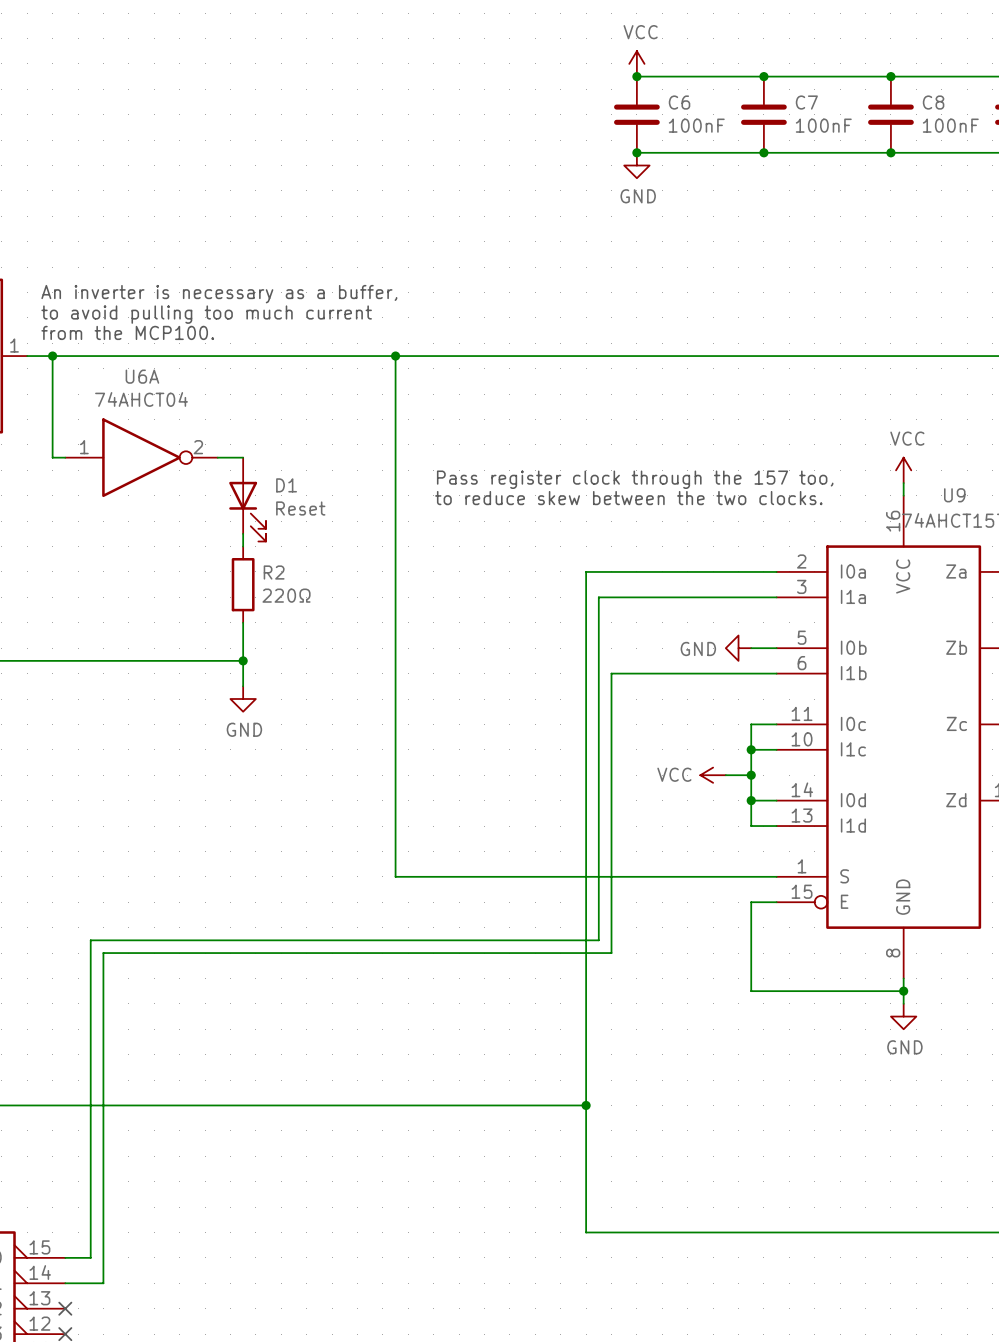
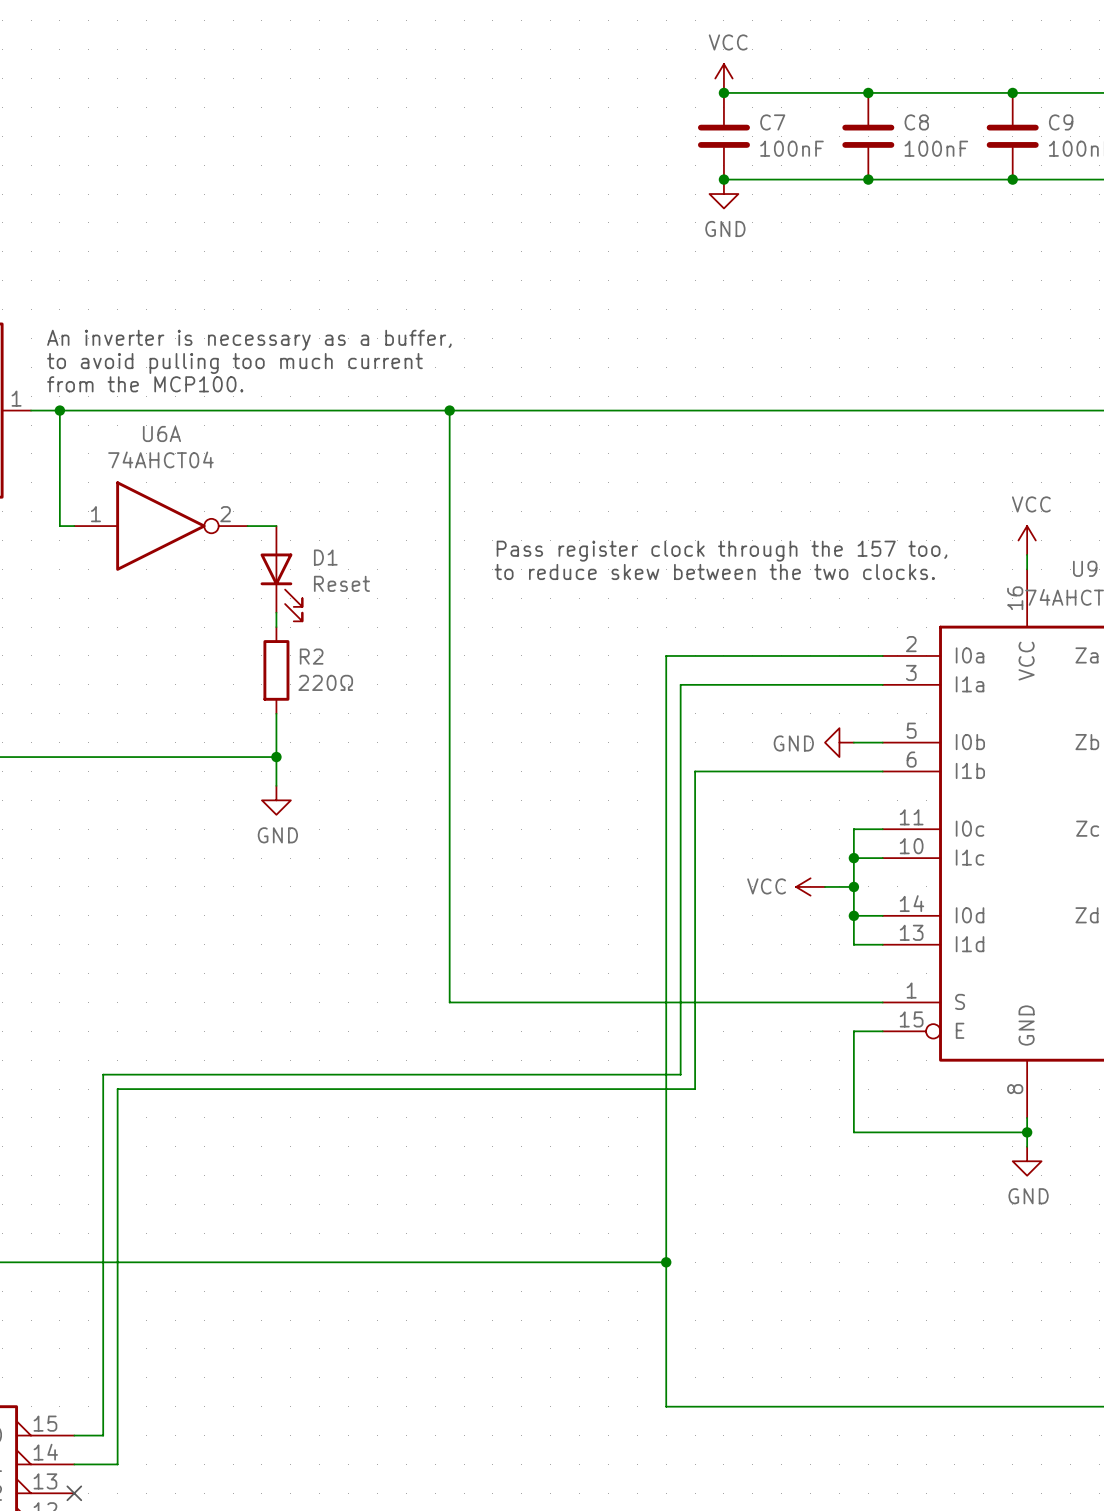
C6 name: C6 (679, 102) -> C7 (772, 122)
C7 name: C7 (806, 102) -> C8 (916, 122)
C8 name: C8 (933, 102) -> C9 (1061, 122)

